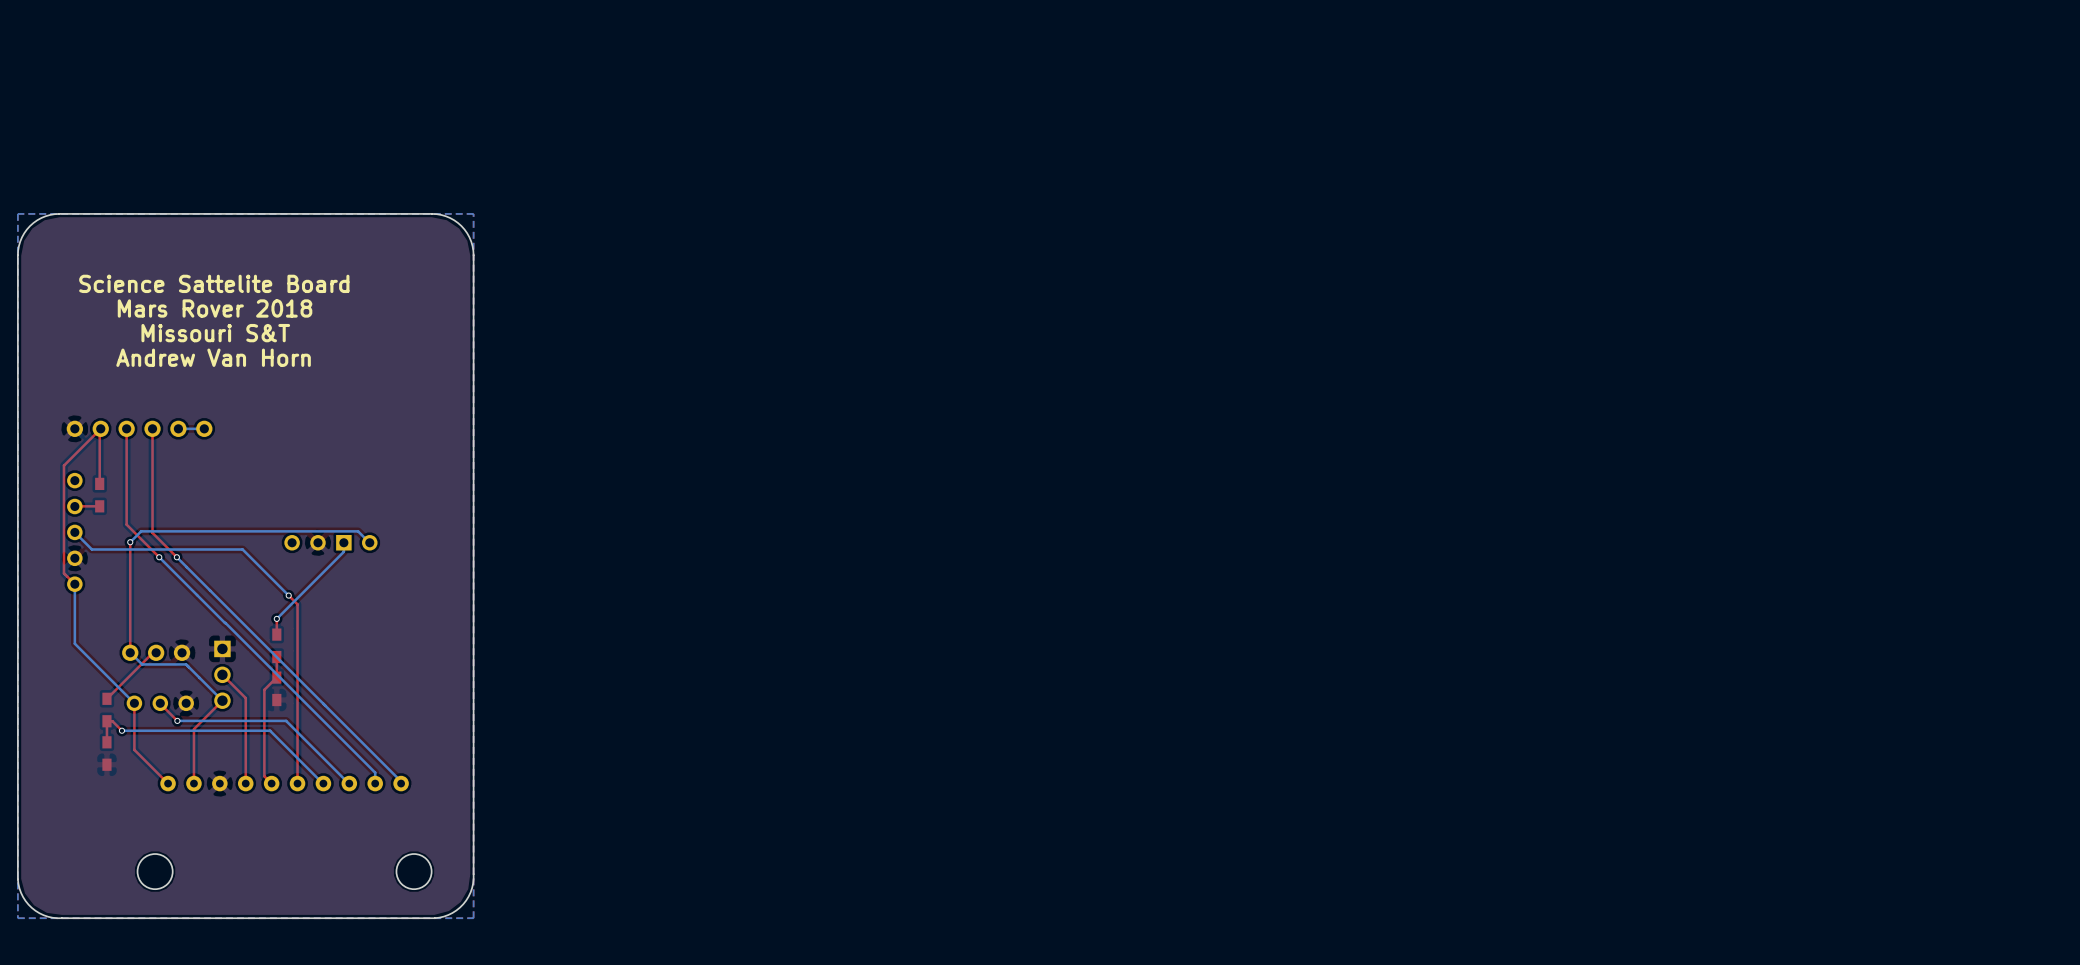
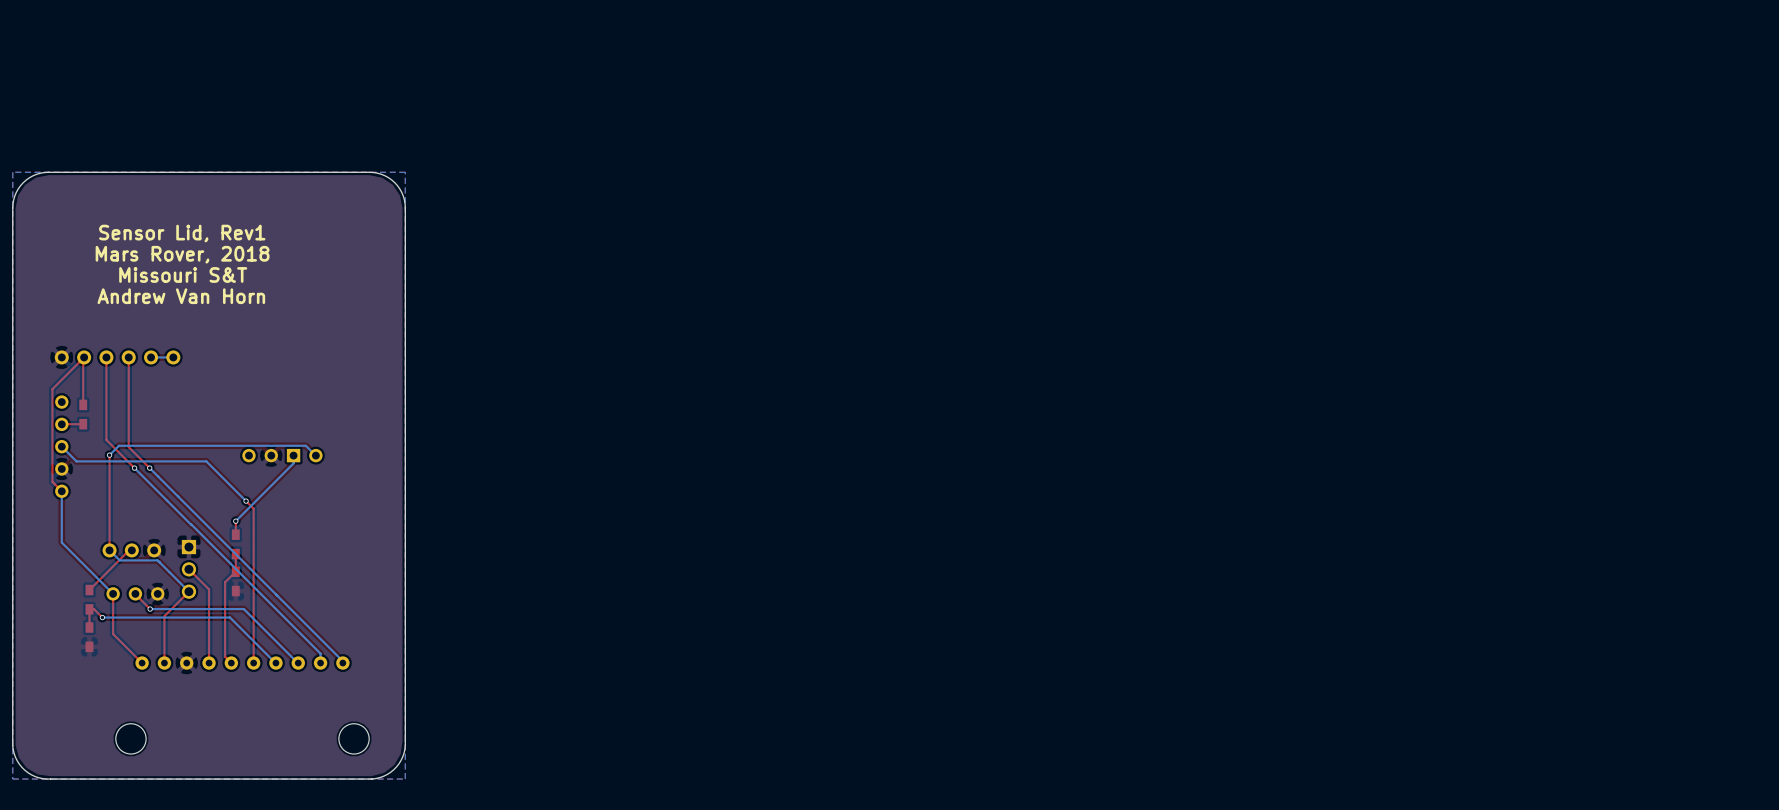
text: Science Sattelite Board (214, 283) -> Sensor Lid, Rev1 (182, 233)
text: Mars Rover 2018 (215, 308) -> Mars Rover, 2018 (182, 254)

